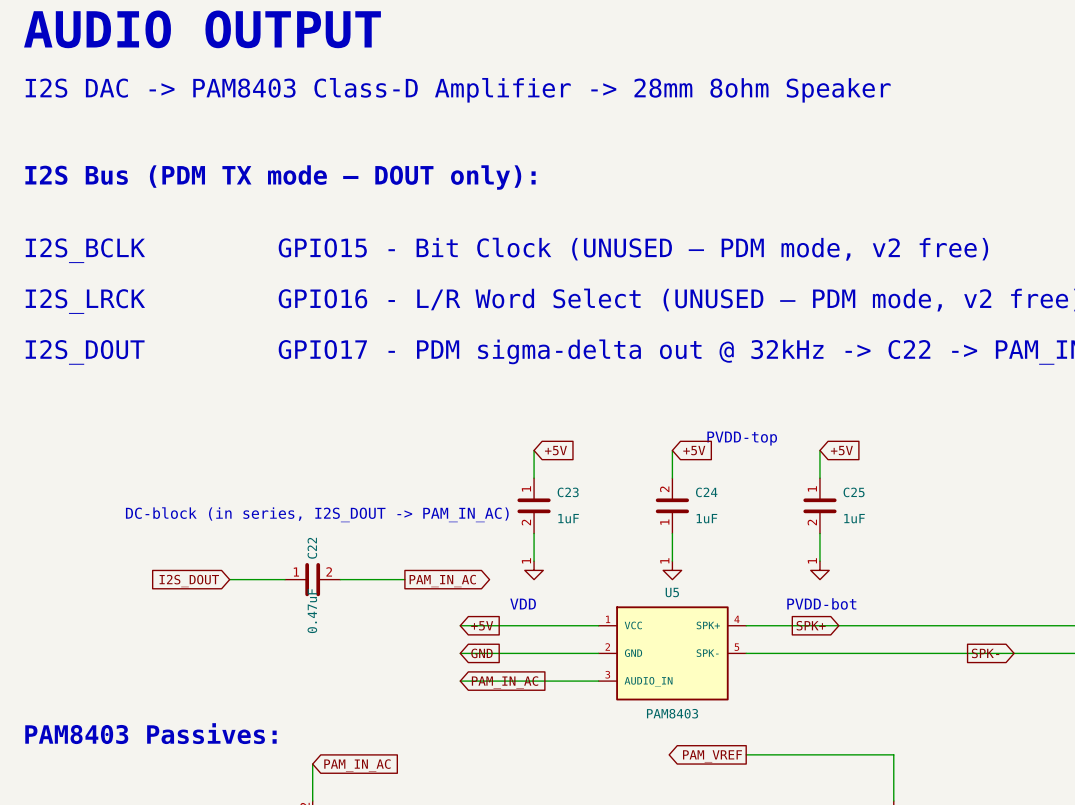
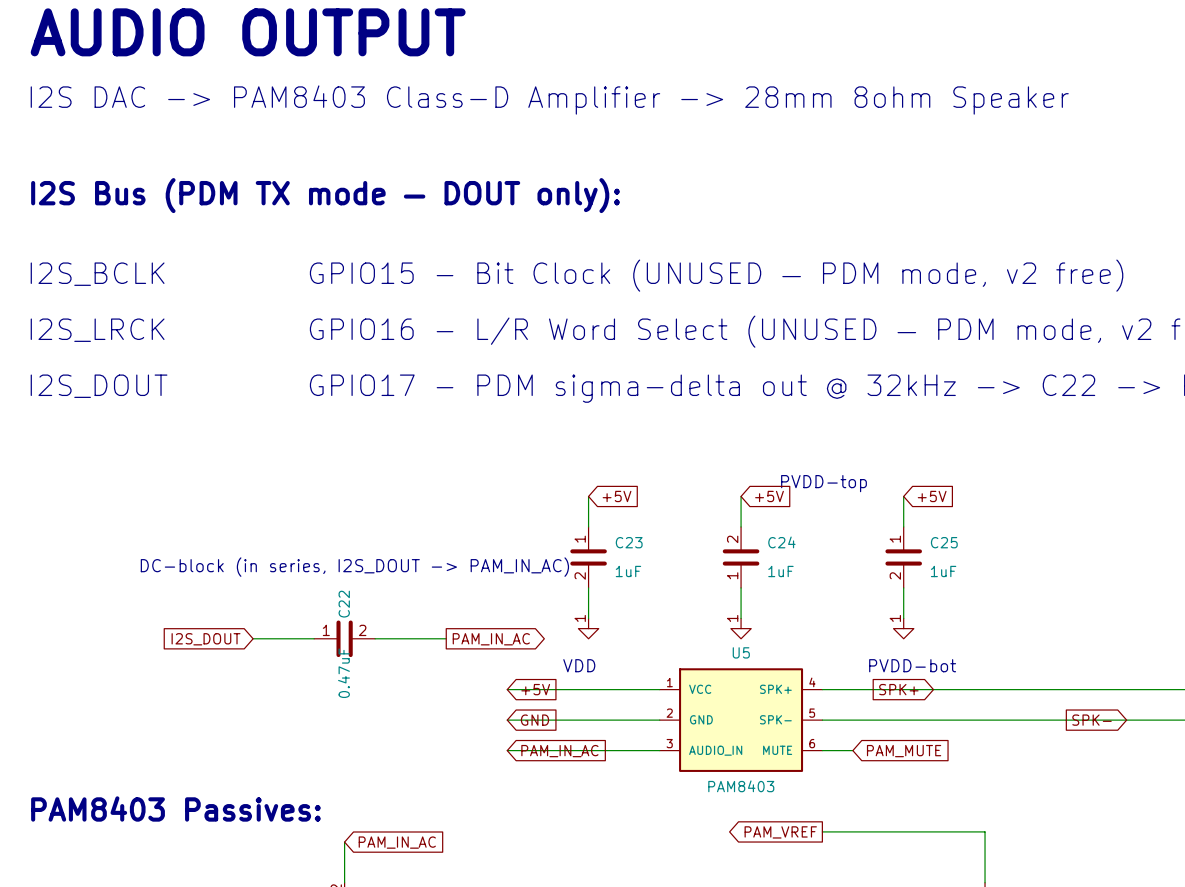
U5 symbol: [598, 606, 747, 701] -> [659, 668, 823, 772]
wire: none -> (822, 750) (852, 750)
global label: none -> PAM_MUTE (904, 751)

